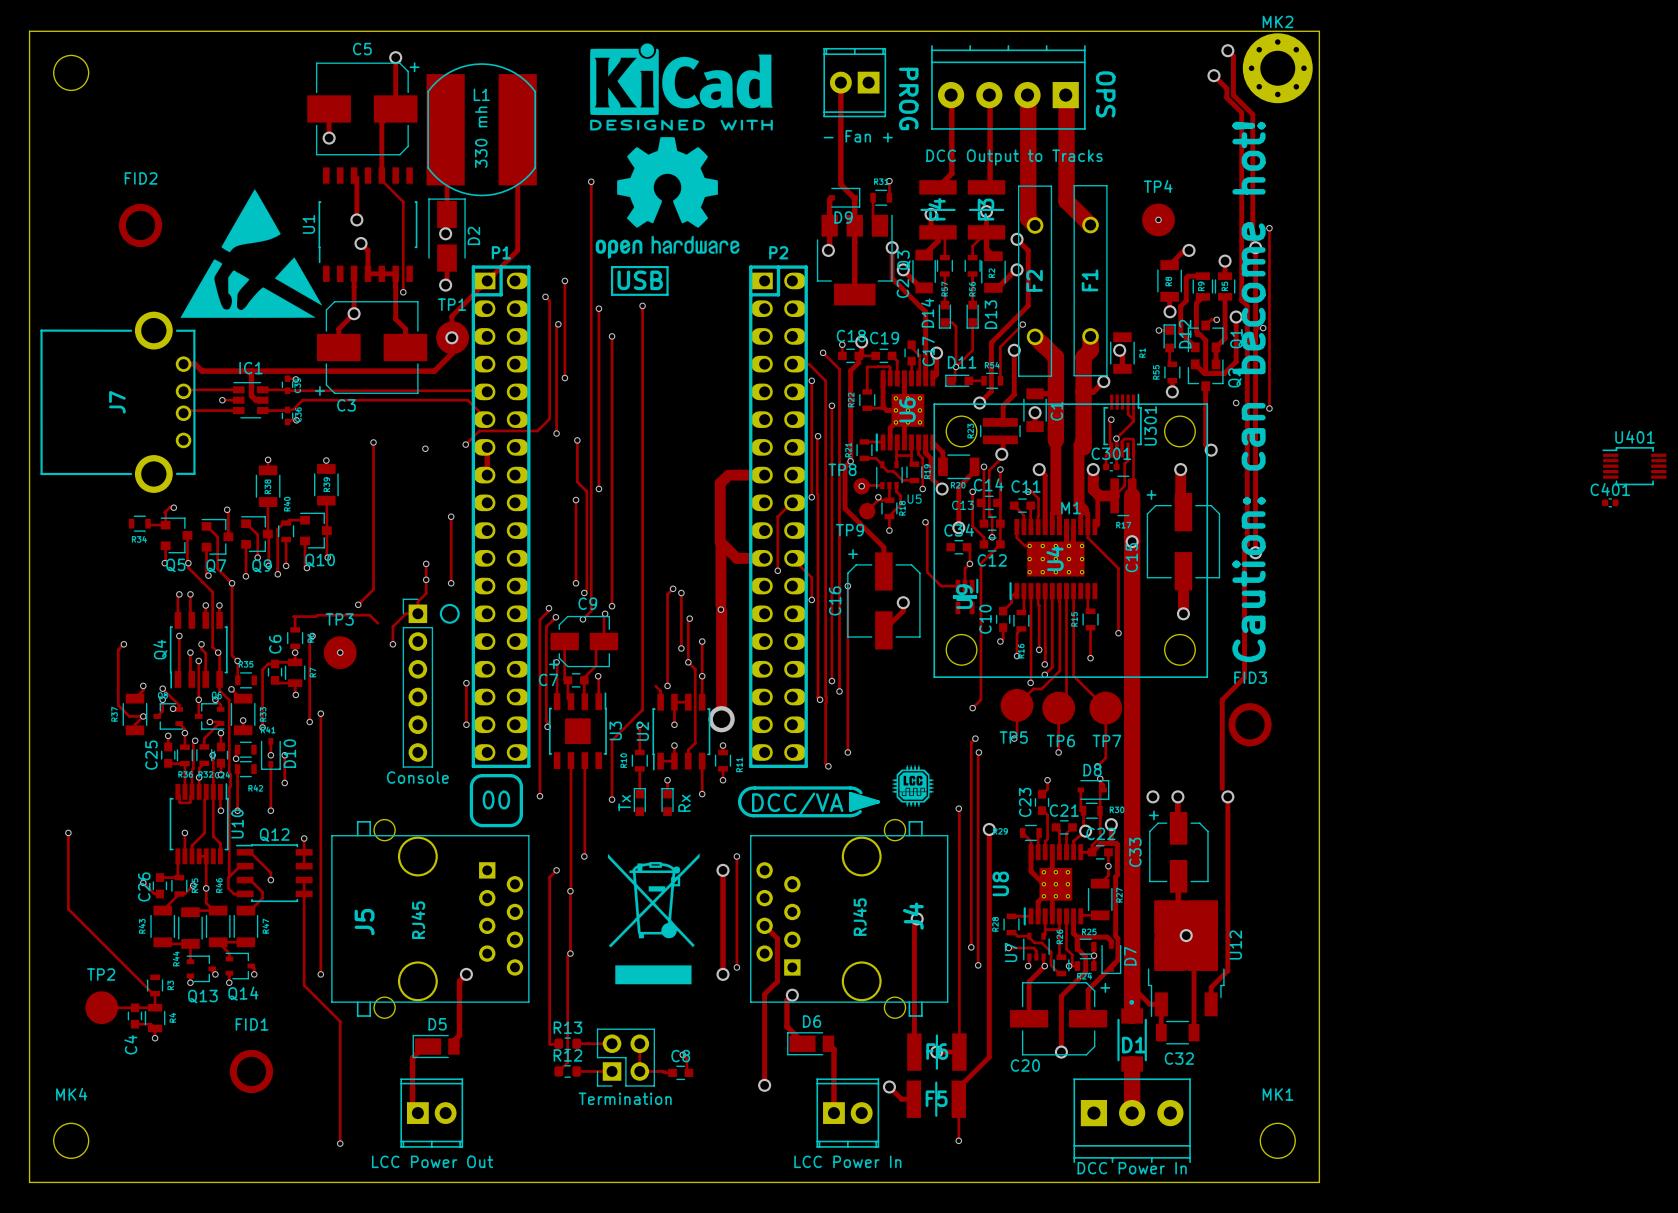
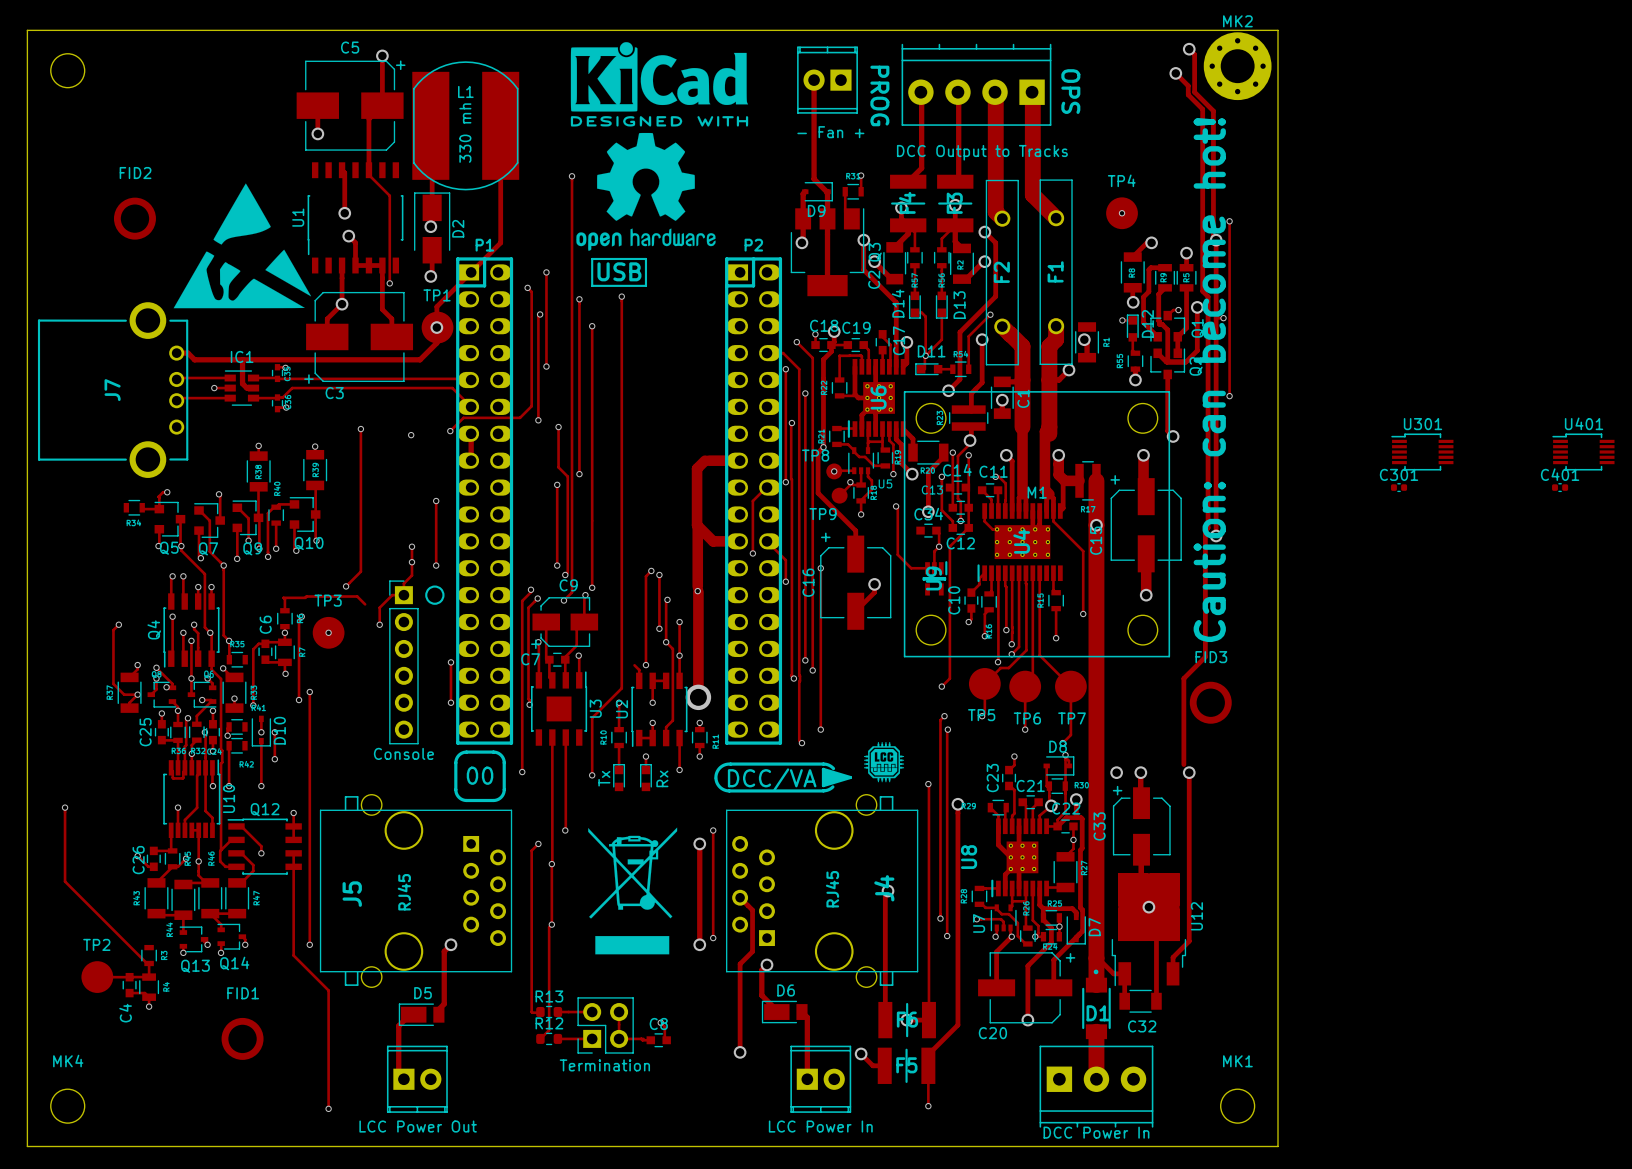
track: (1128, 402) (1128, 414) (1133, 419) -> none
track: (1133, 402) (1133, 421) (1116, 438) (1116, 466) -> none
via: (1236, 402) -> none
track: (1111, 419) (1110, 448) (1111, 450) (1106, 455) (1106, 466) -> none
via: (1111, 419) -> none
U301 rotation: 0° (1122, 425) -> 90° counterclockwise (1422, 452)
U301 position: (1122, 425) -> (1422, 452)
via: (1116, 438) -> none
track: (1122, 450) (1121, 441) (1124, 439) (1132, 439) (1132, 495) -> none
track: (1128, 450) (1128, 460) (1124, 463) (1124, 485) (1114, 495) -> none
C301 position: (1111, 466) -> (1399, 487)

